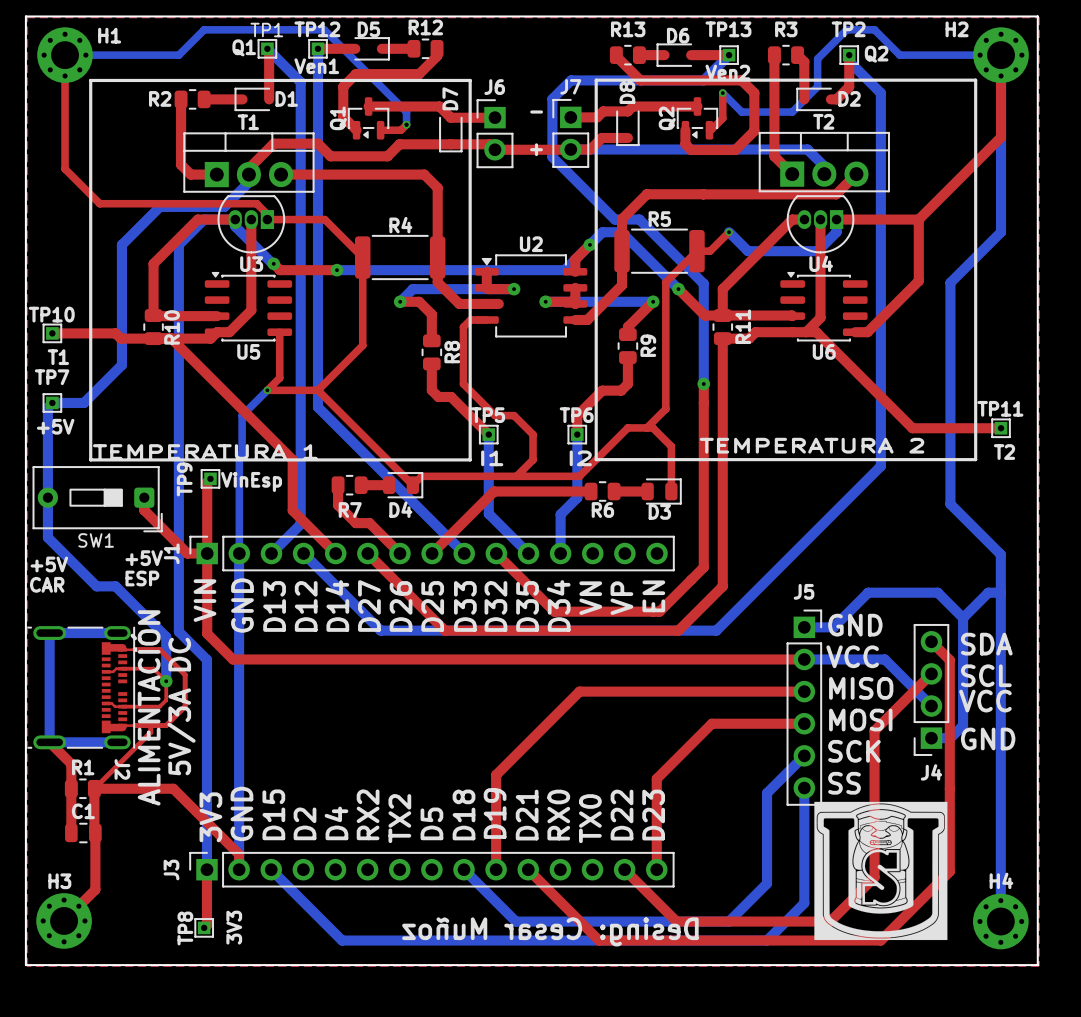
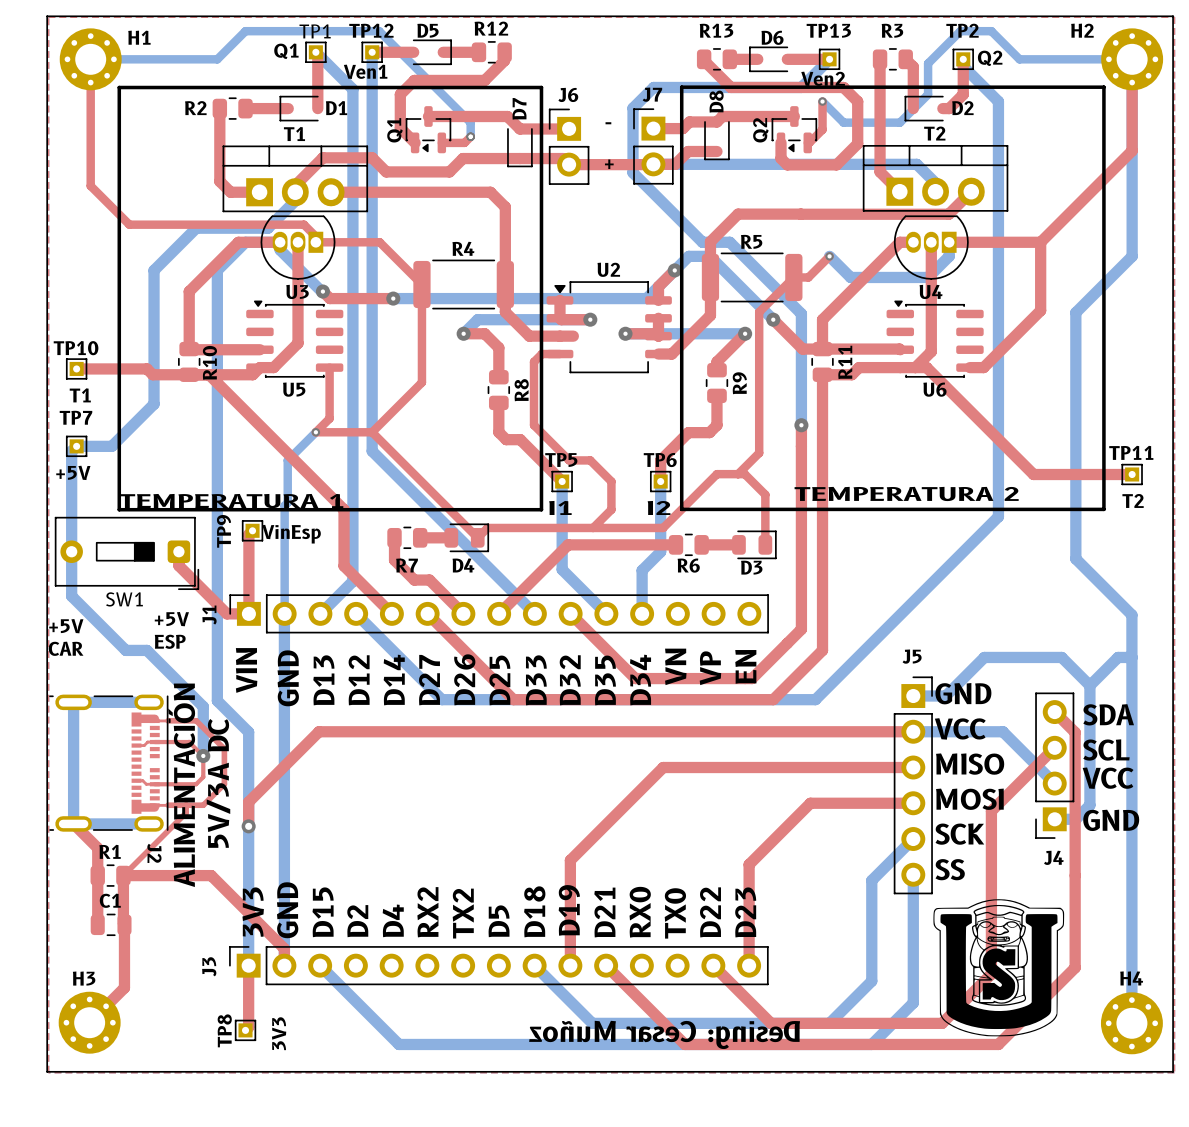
top track: (207, 553) (207, 633) (232, 659) (270, 659) -> (248, 826) (248, 802) (318, 731)
via: none -> (248, 826)
drawing shape: [814, 801, 948, 941] -> [933, 899, 1065, 1037]

